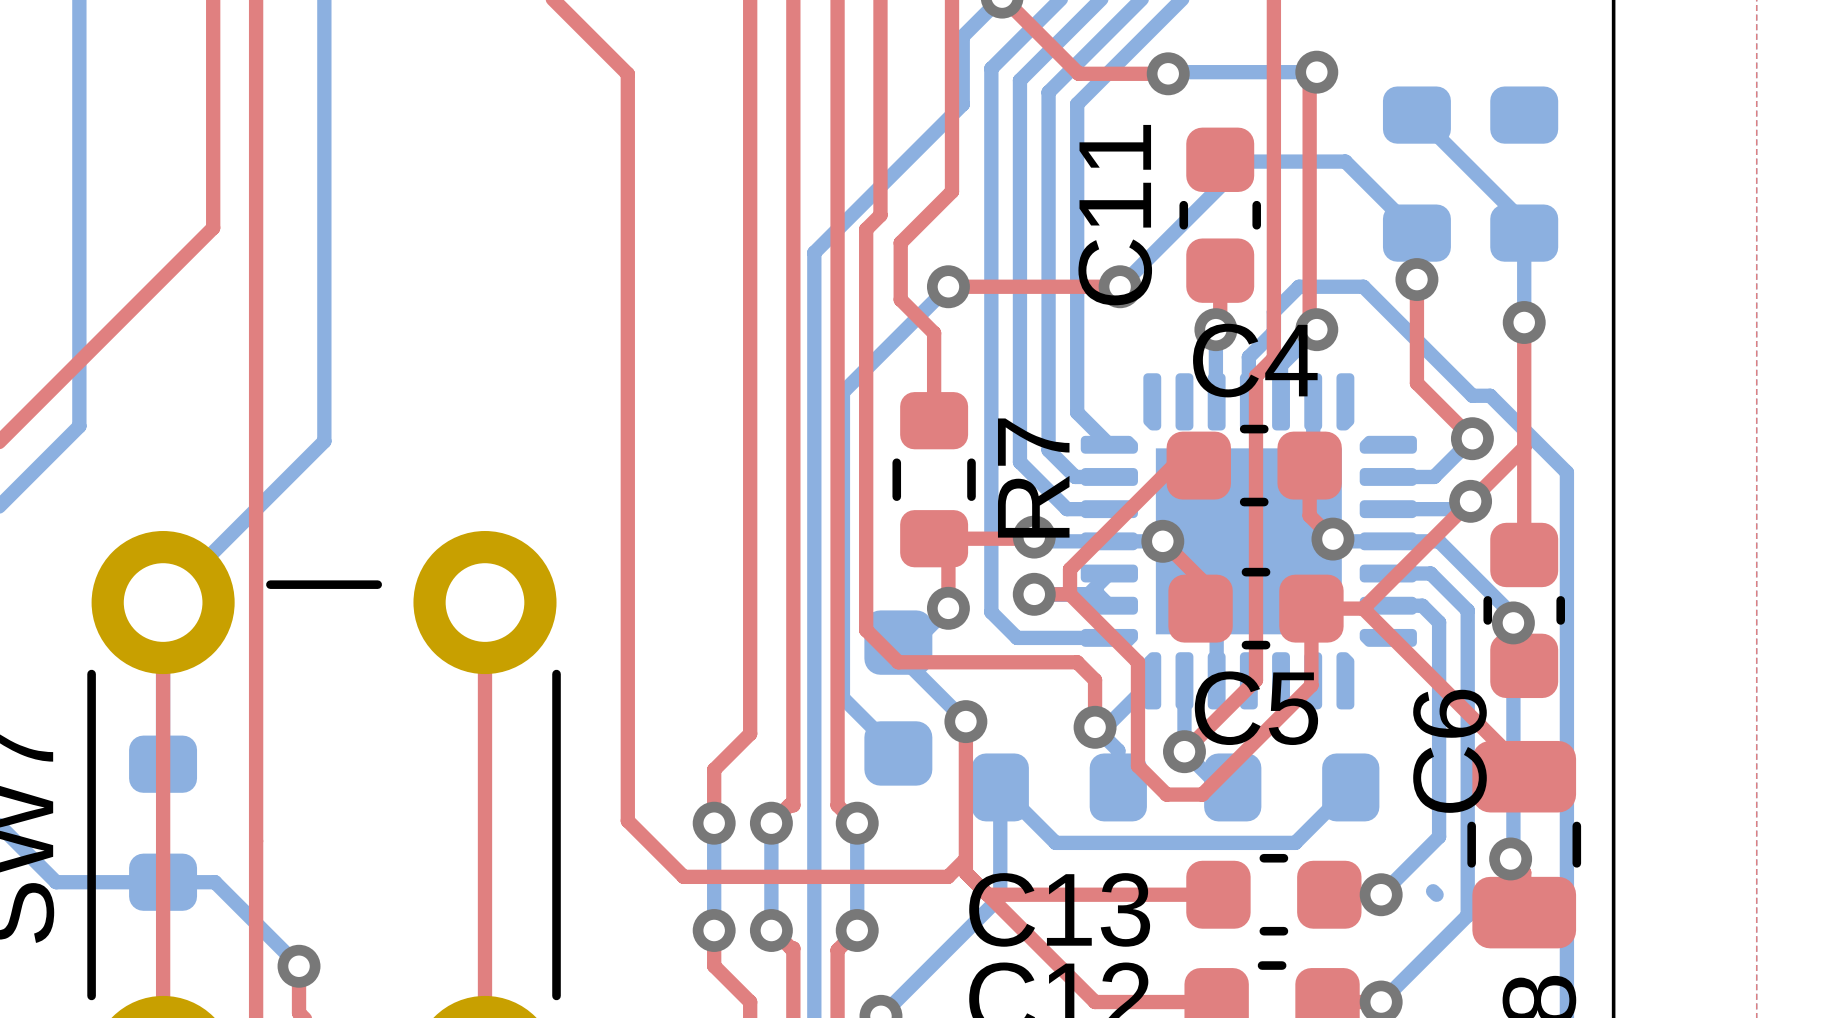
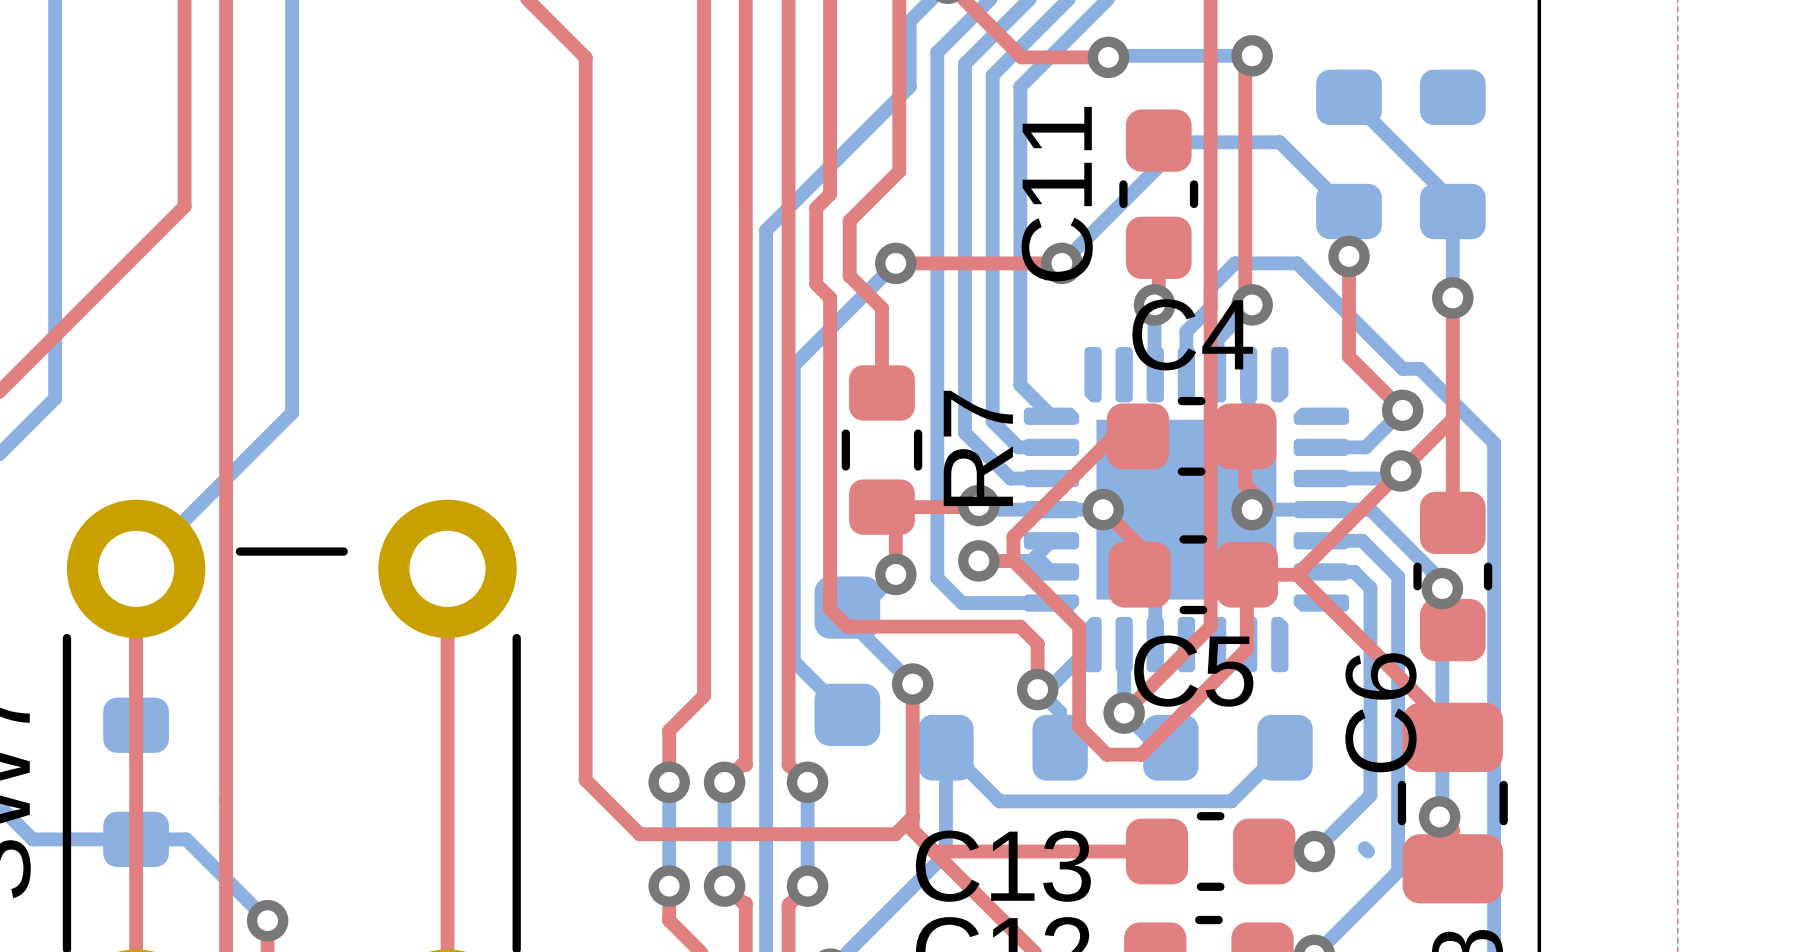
top track: (866, 308) (866, 630) (880, 644) -> (816, 284) (830, 297) (830, 609)
top track: (1273, 358) (1256, 376) (1256, 680) -> (1210, 332) (1210, 626) (1193, 643)
via position: (1332, 539) -> (1252, 509)

